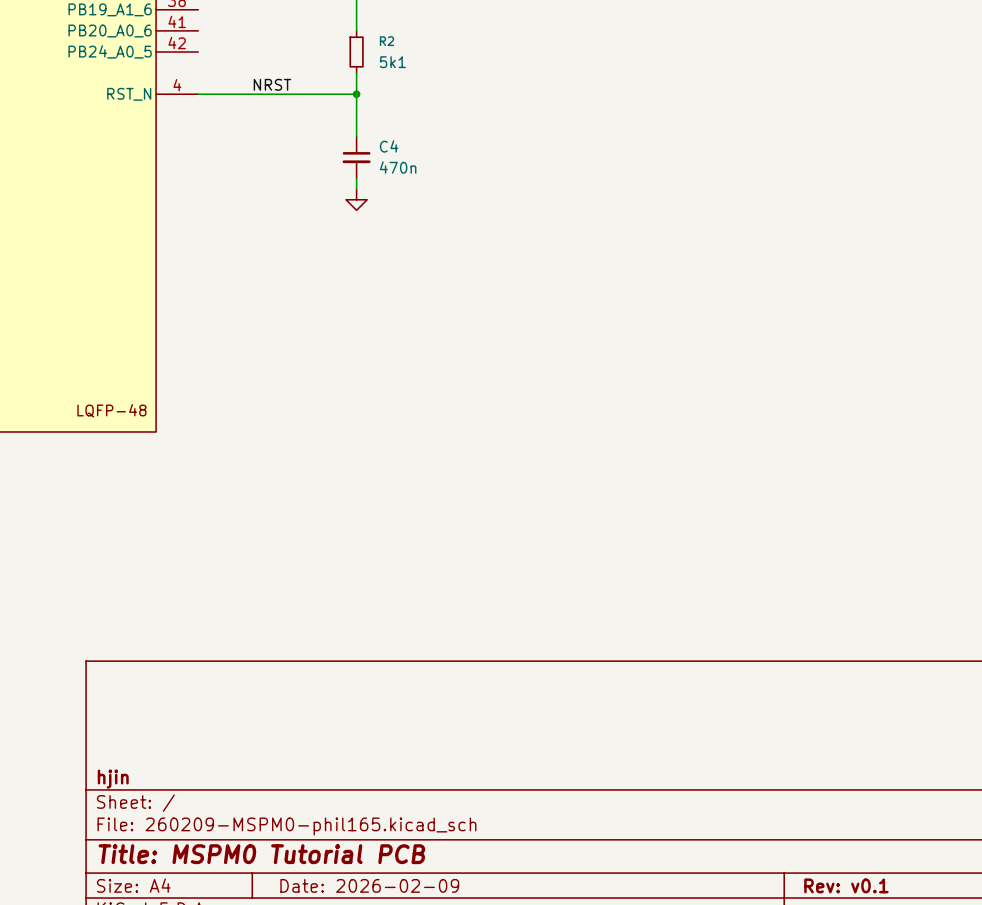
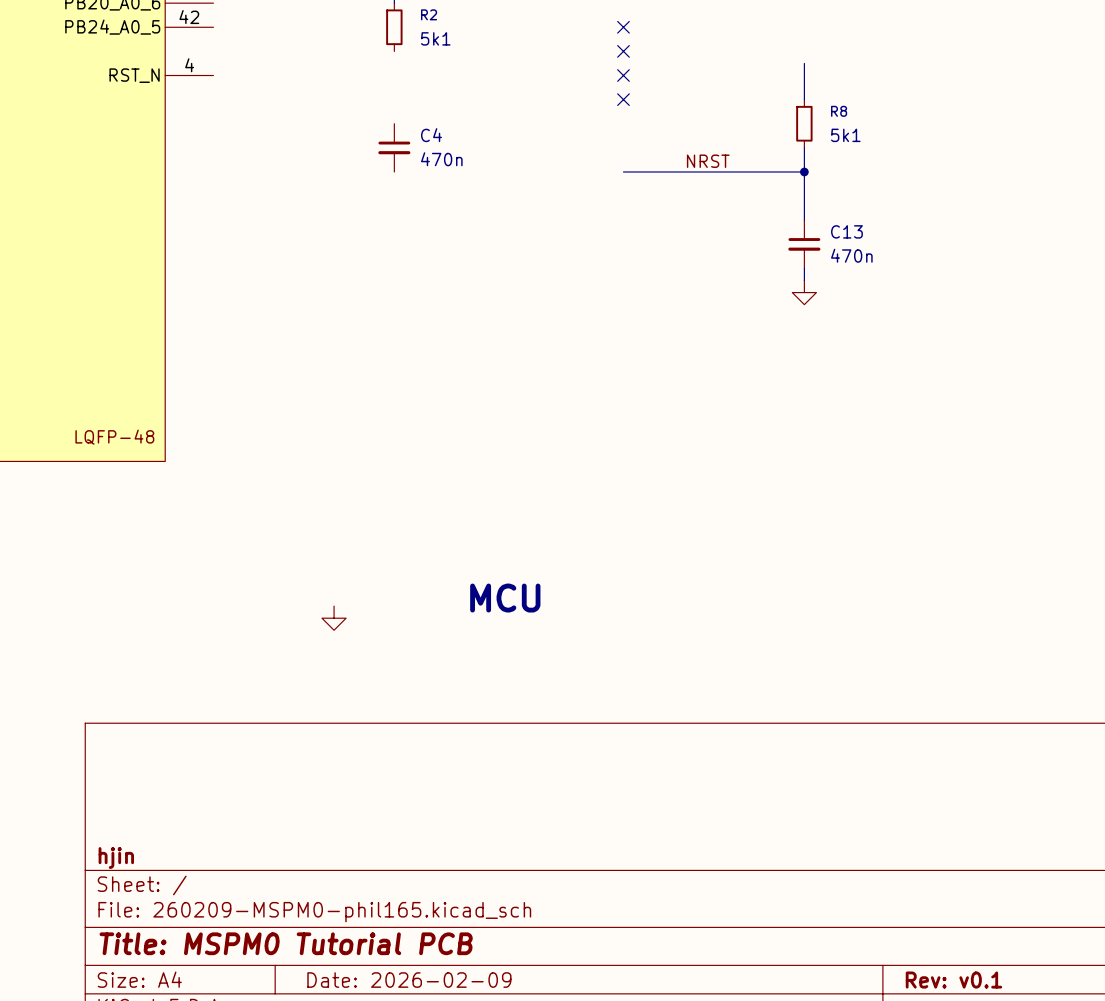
no-connect mark: none -> (623, 27)
wire: (356, 73) (356, 136) -> none
no-connect mark: none -> (623, 51)
wire: none -> (804, 63) (804, 99)
label: NRST (272, 84) -> none
wire: (198, 94) (356, 94) -> none
junction: (356, 94) -> none
no-connect mark: none -> (623, 75)
no-connect mark: none -> (623, 99)
R8: none -> 5k1 (804, 123)
wire: none -> (804, 147) (804, 220)
label: none -> NRST (708, 161)
wire: (356, 178) (356, 189) -> none
wire: none -> (623, 171) (804, 171)
junction: none -> (804, 171)
power symbol: (356, 199) -> none
C13: none -> 470n (804, 244)
wire: none -> (804, 268) (804, 280)
power symbol: none -> (804, 292)
text: none -> MCU (505, 598)
power symbol: none -> (334, 618)

